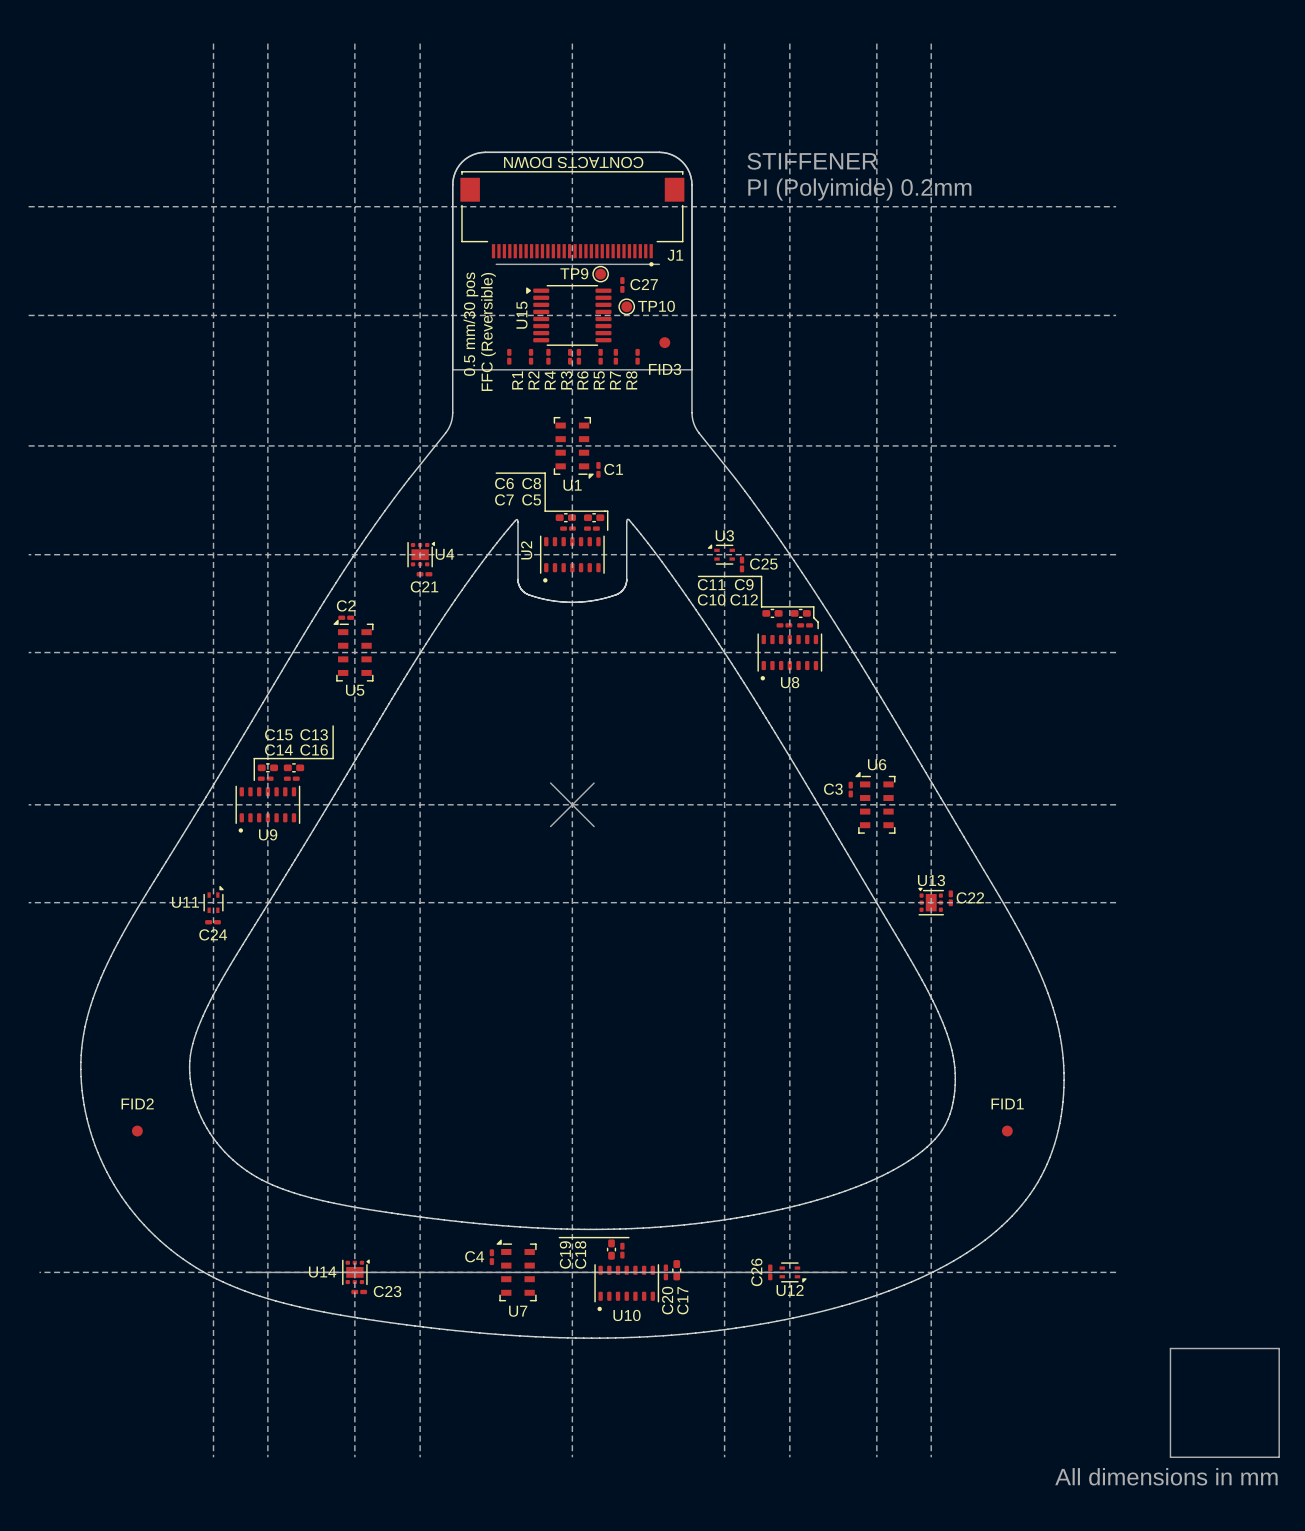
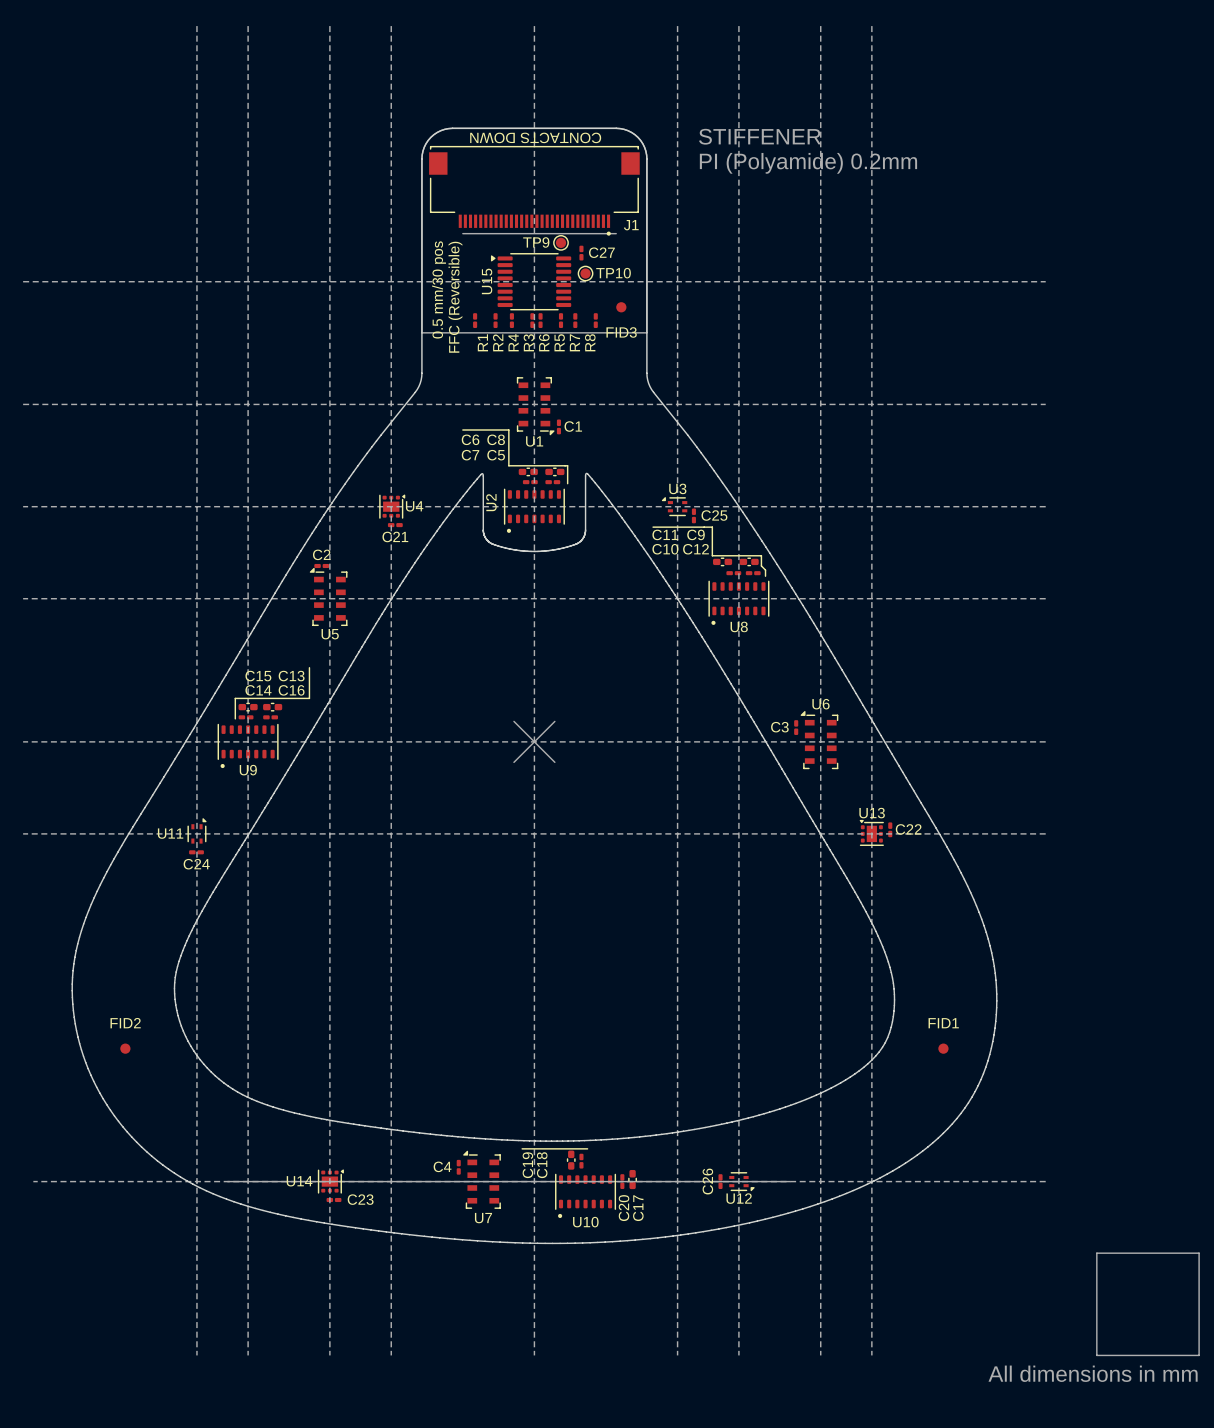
text: PI (Polyimide) 0.2mm (859, 189) -> PI (Polyamide) 0.2mm (808, 163)
line: (28, 206) (1116, 206) -> none

